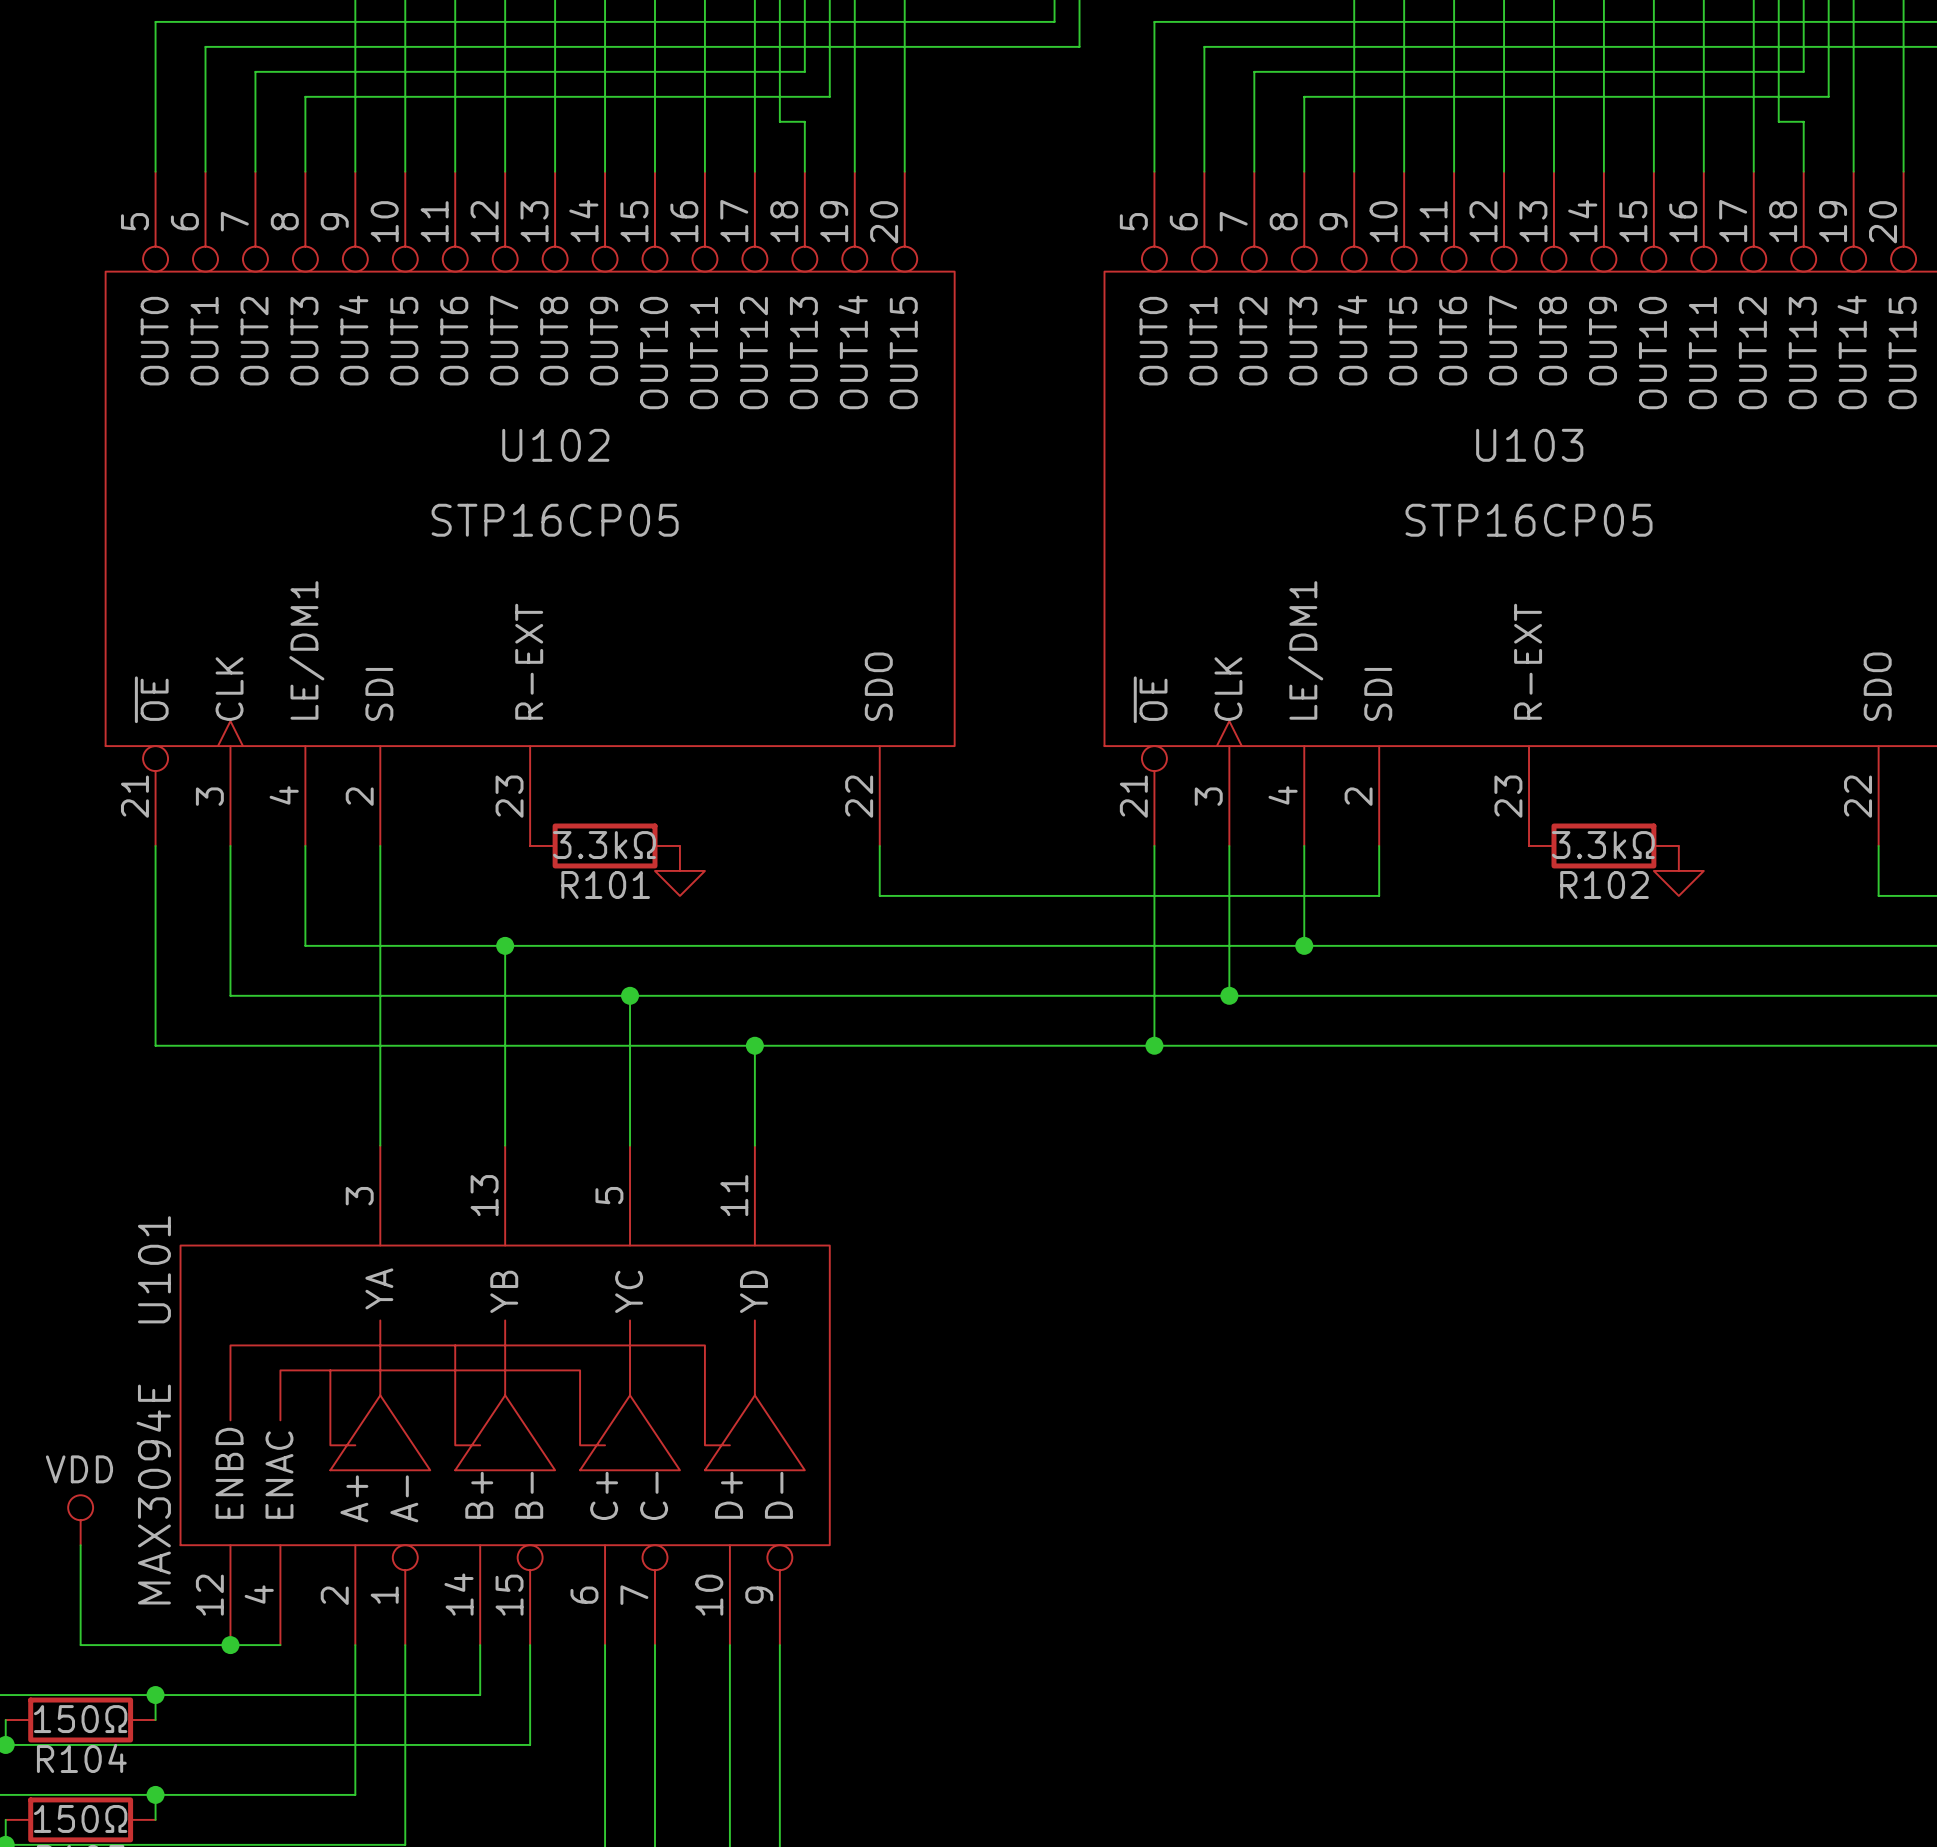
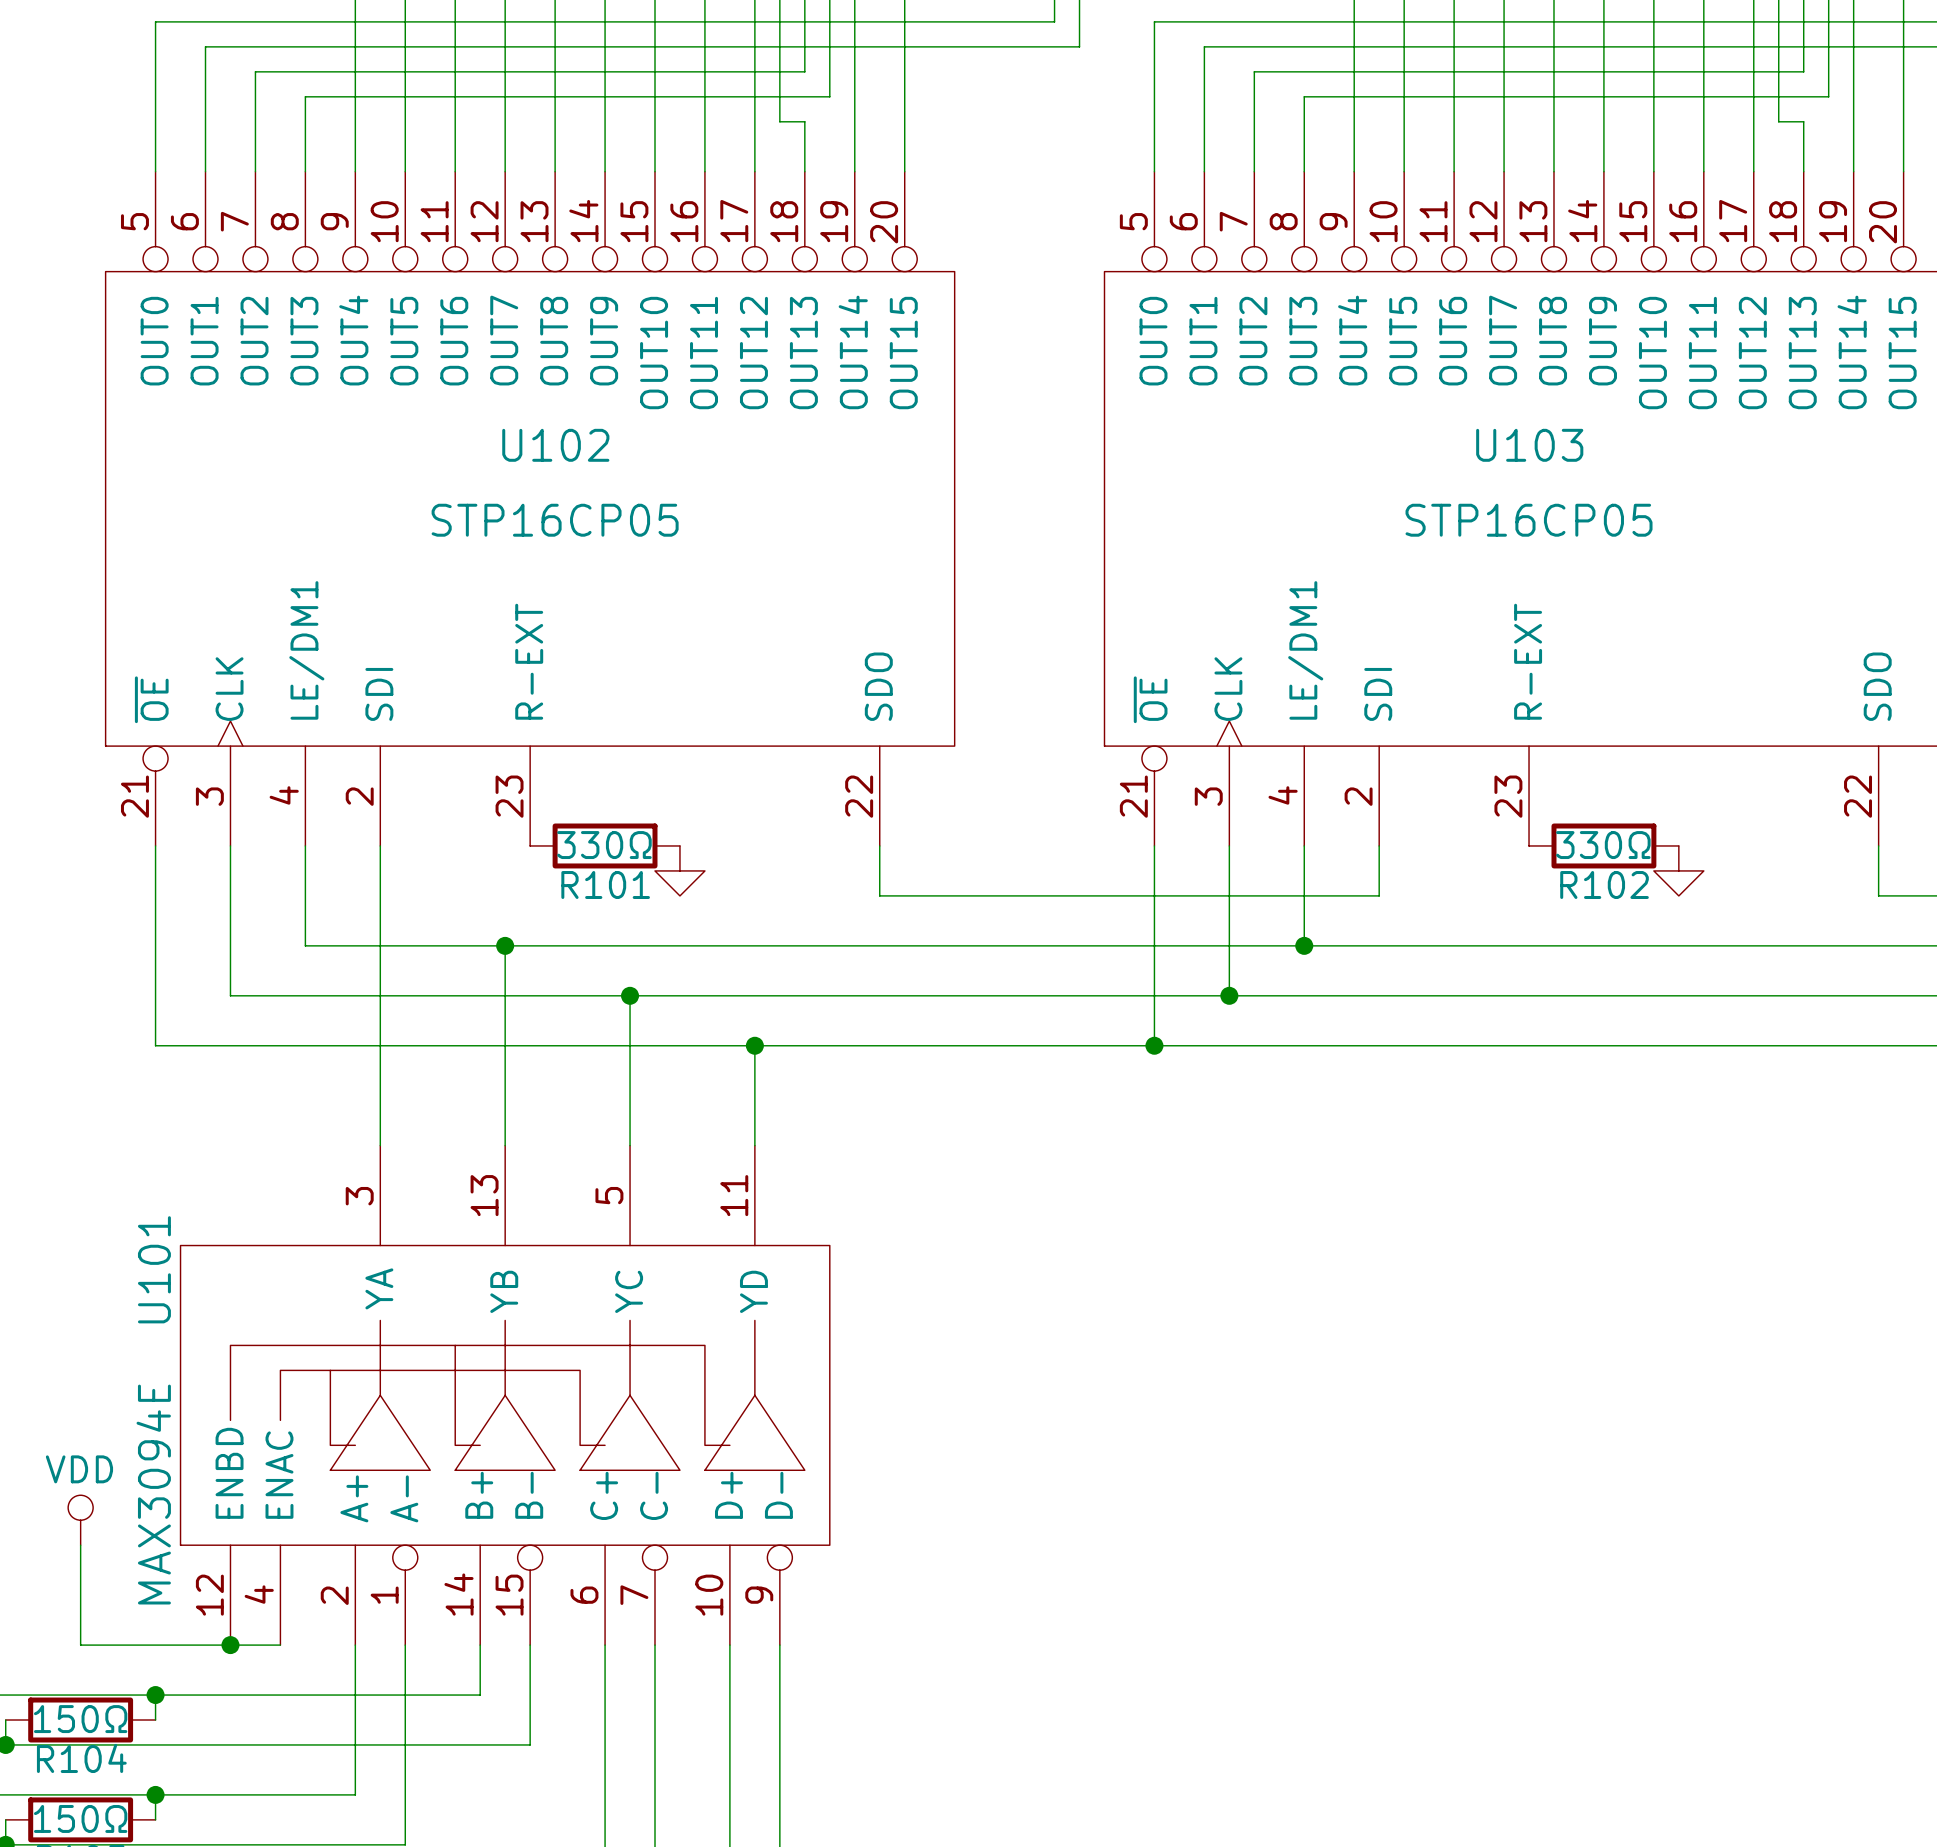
R101 value: 3.3kΩ (604, 845) -> 330Ω (604, 845)
R102 value: 3.3kΩ (1603, 845) -> 330Ω (1603, 845)

